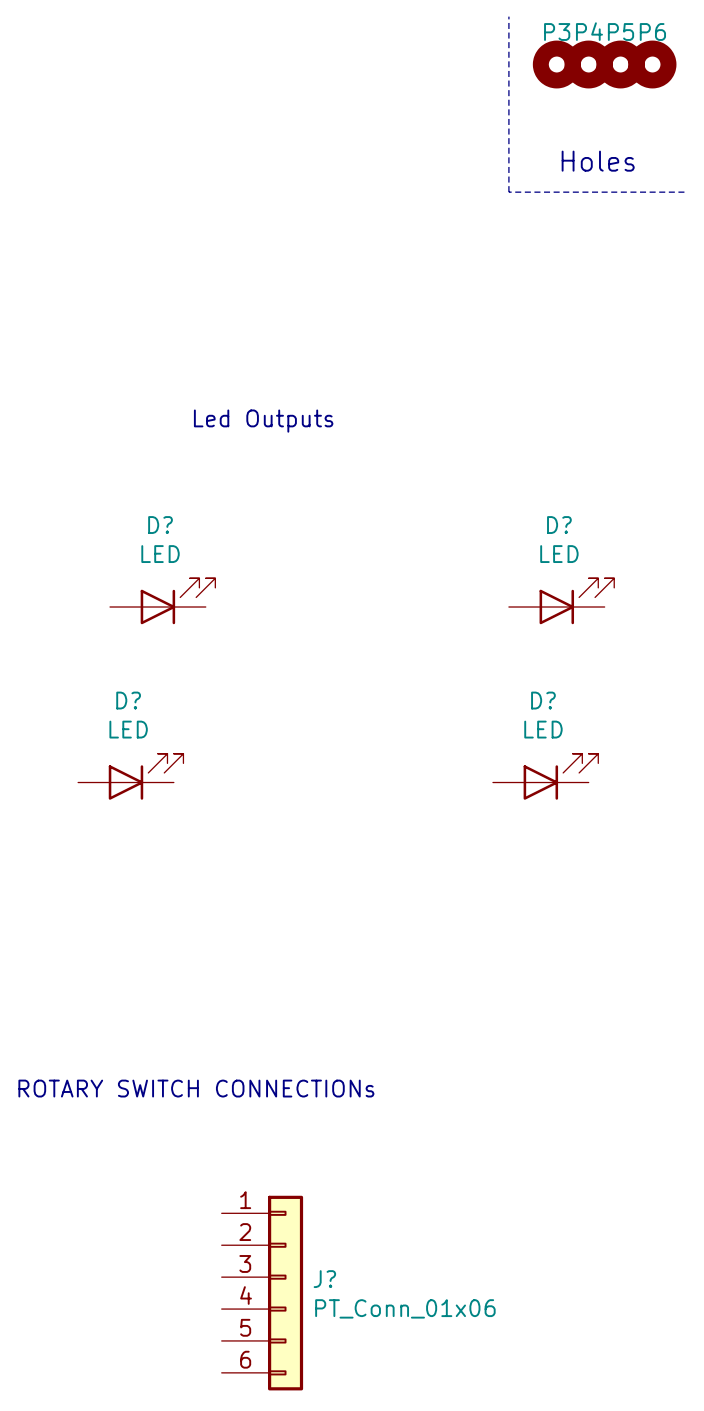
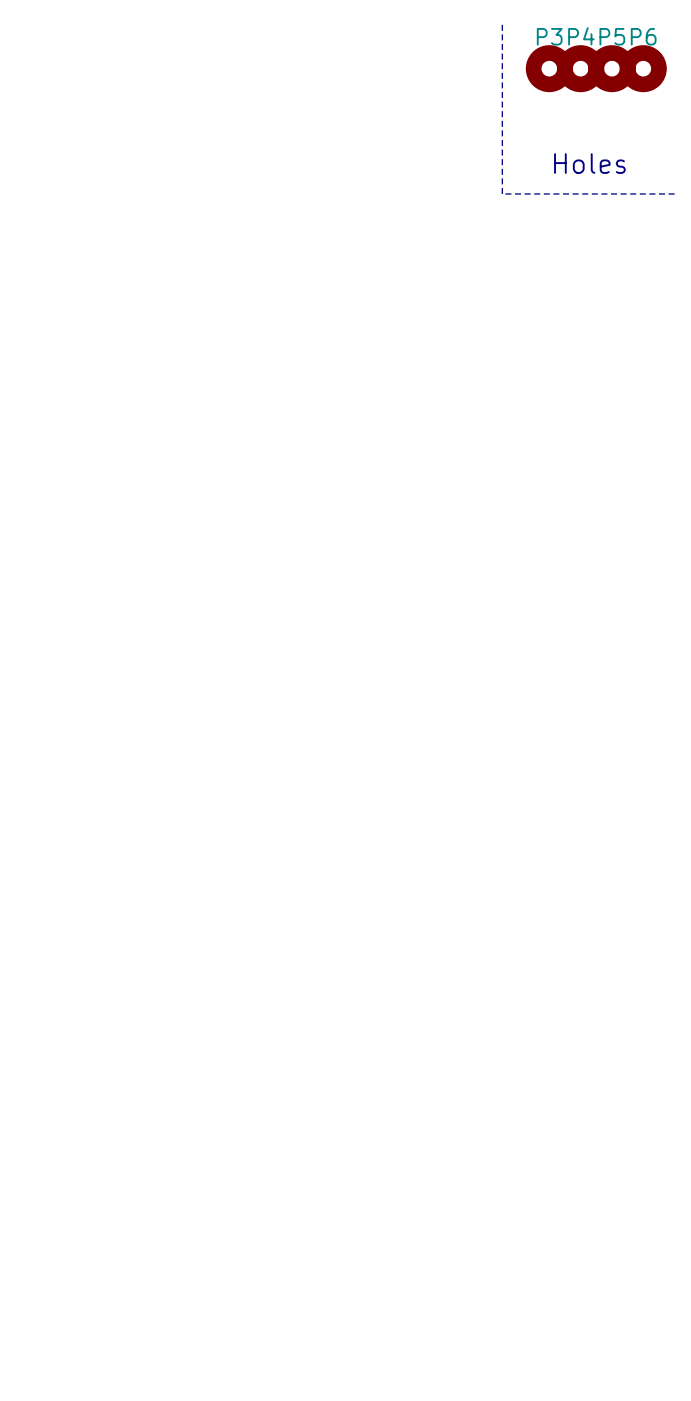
text: Led Outputs (263, 421) -> none
D?: LED (162, 601) -> none
D?: LED (561, 601) -> none
D?: LED (130, 776) -> none
D?: LED (545, 776) -> none
text: ROTARY SWITCH CONNECTIONs (196, 1088) -> none
J?: PT_Conn_01x06 (262, 1293) -> none

